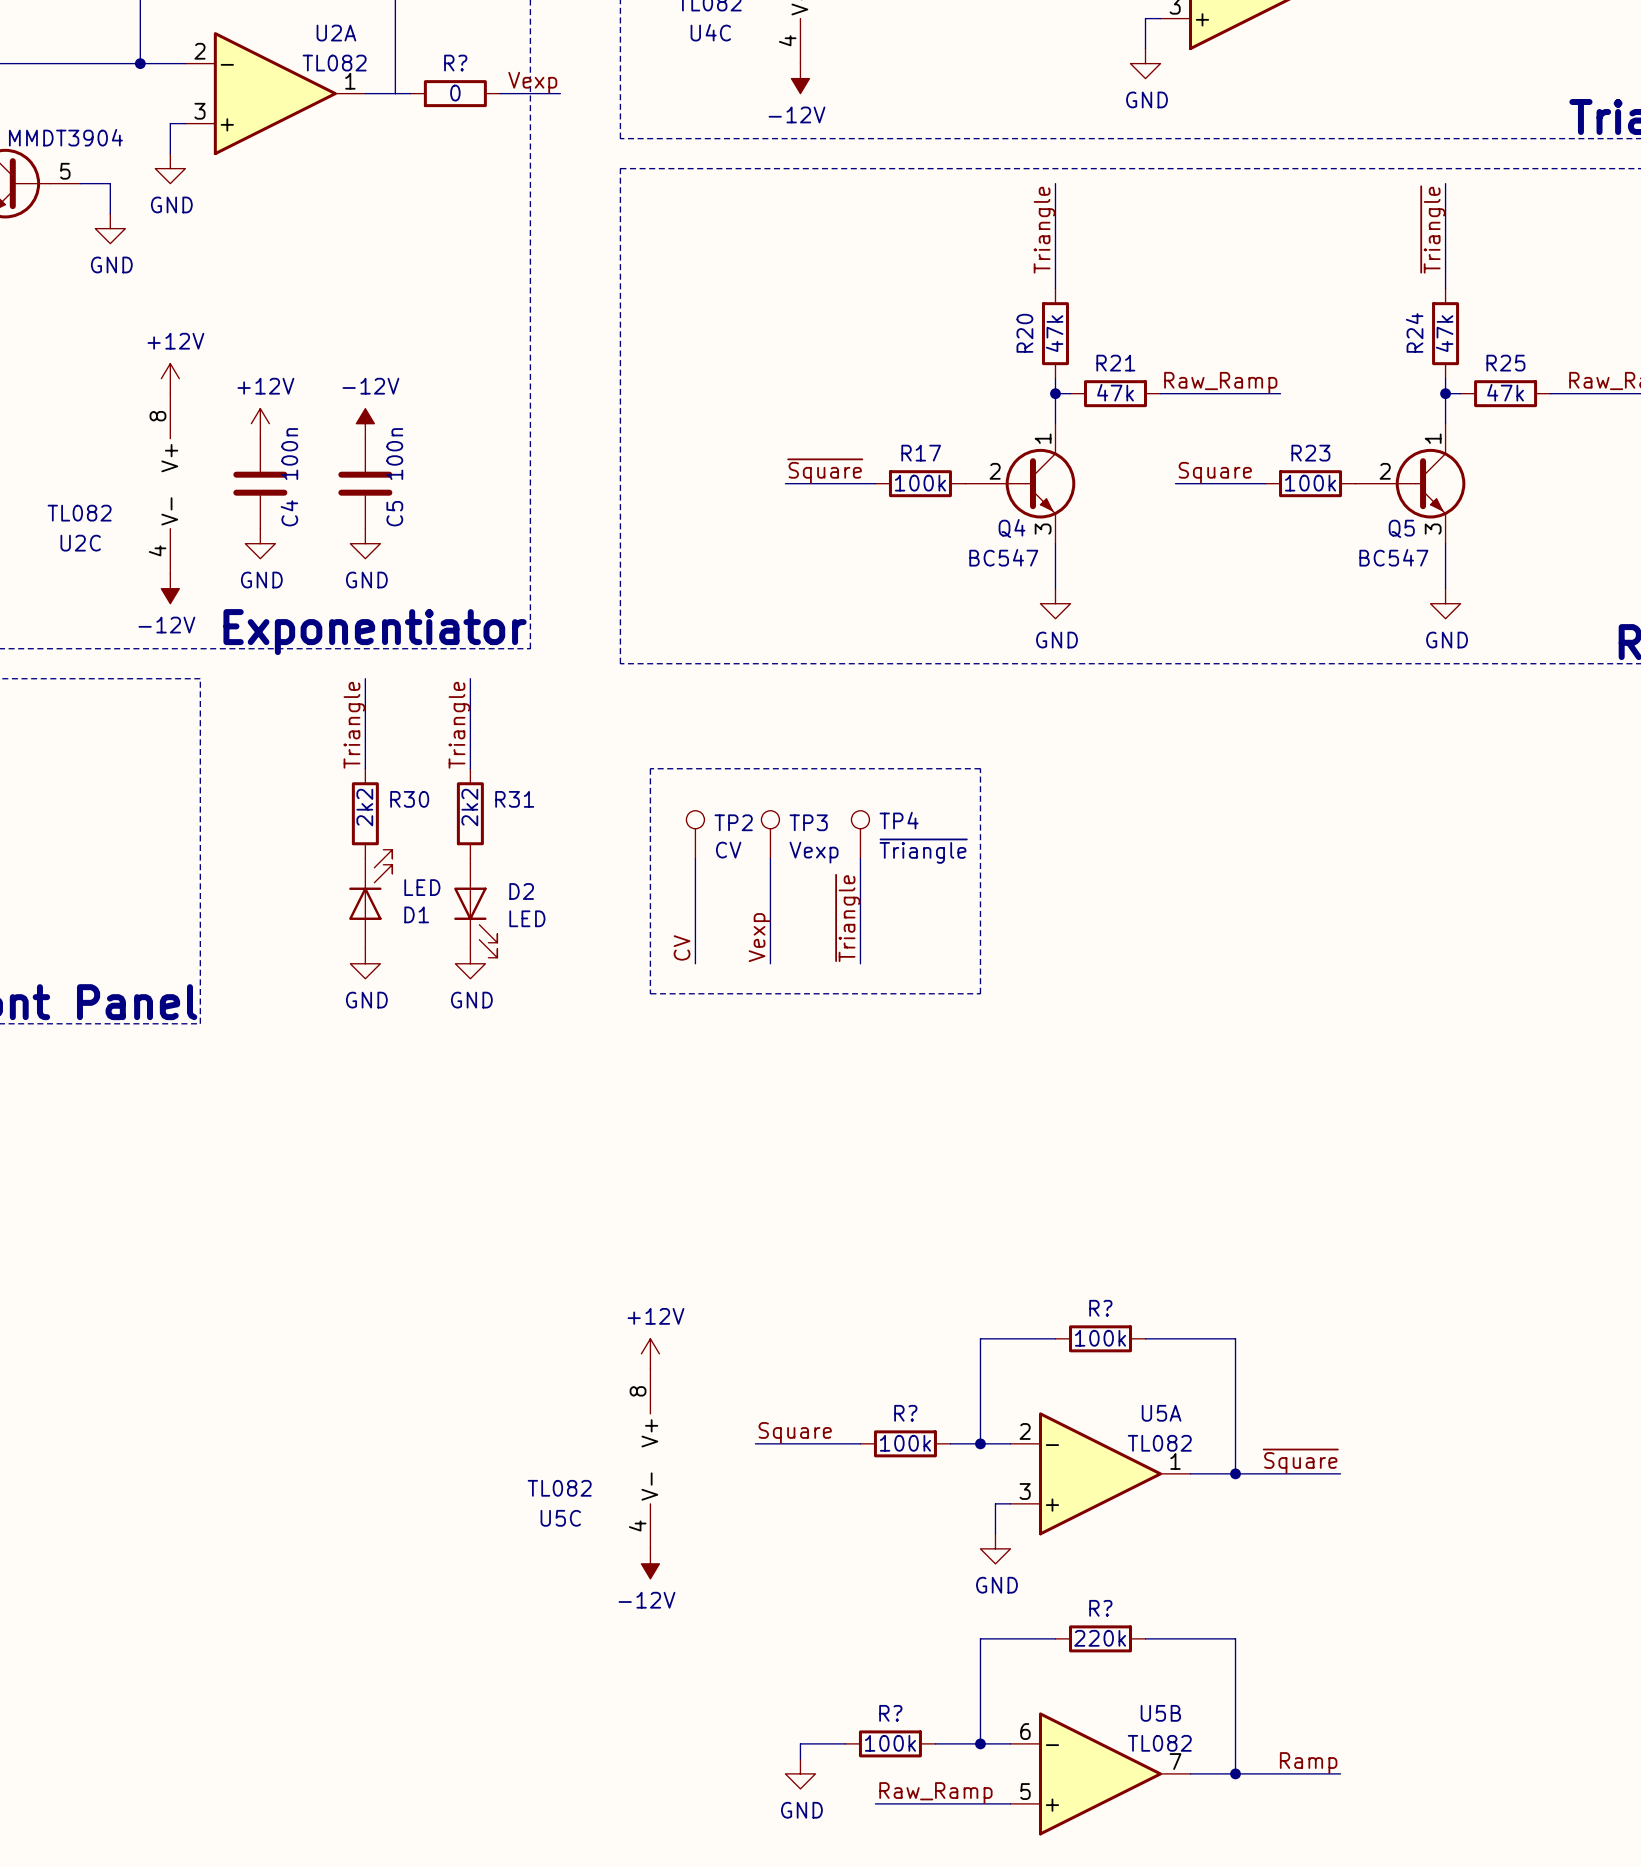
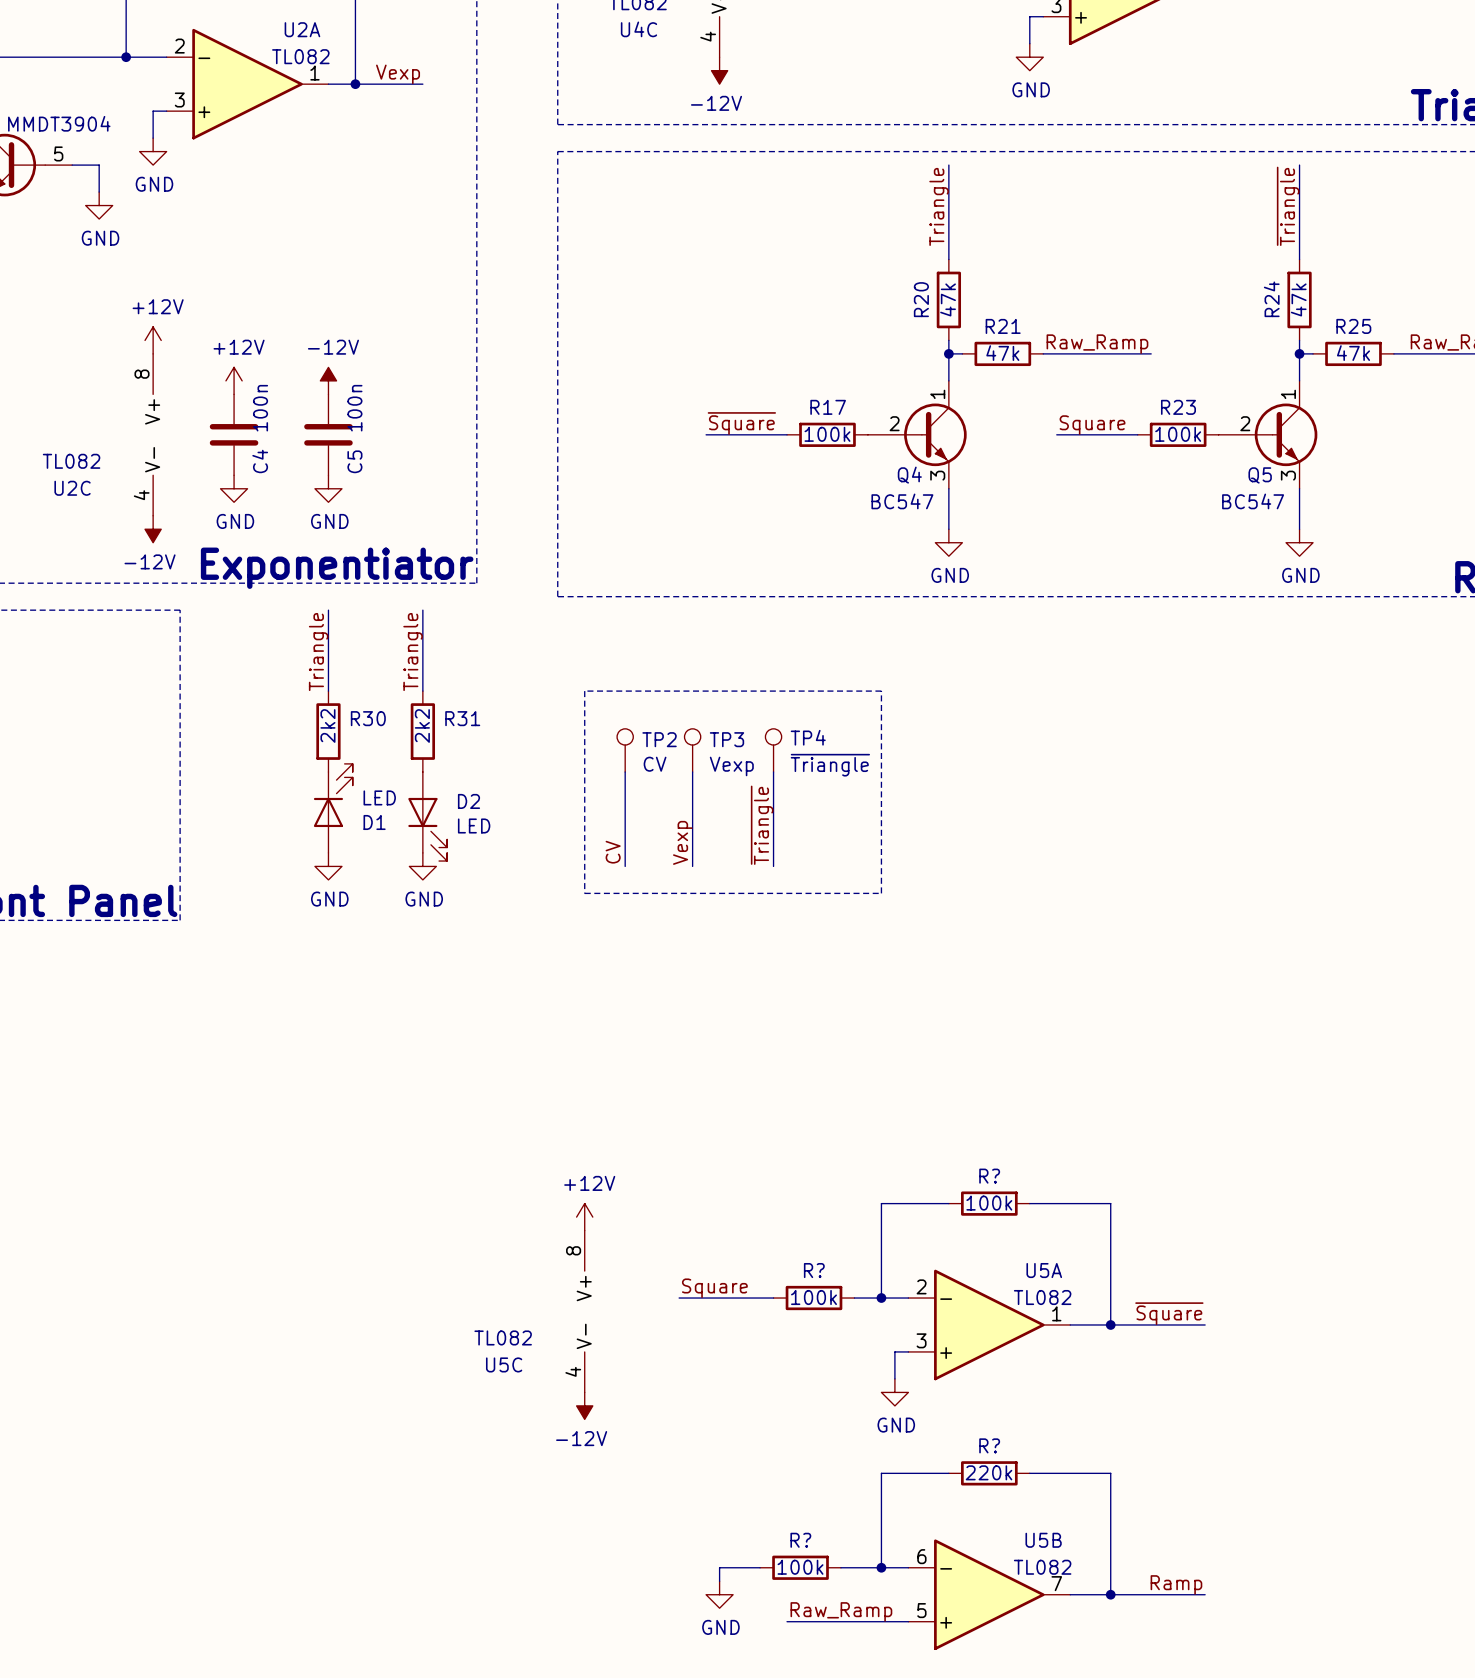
label position: Vexp (532, 82) -> Vexp (398, 74)
junction: none -> (355, 84)
R?: 0 (455, 93) -> none
wire: (500, 93) (560, 93) -> (368, 84) (422, 84)

